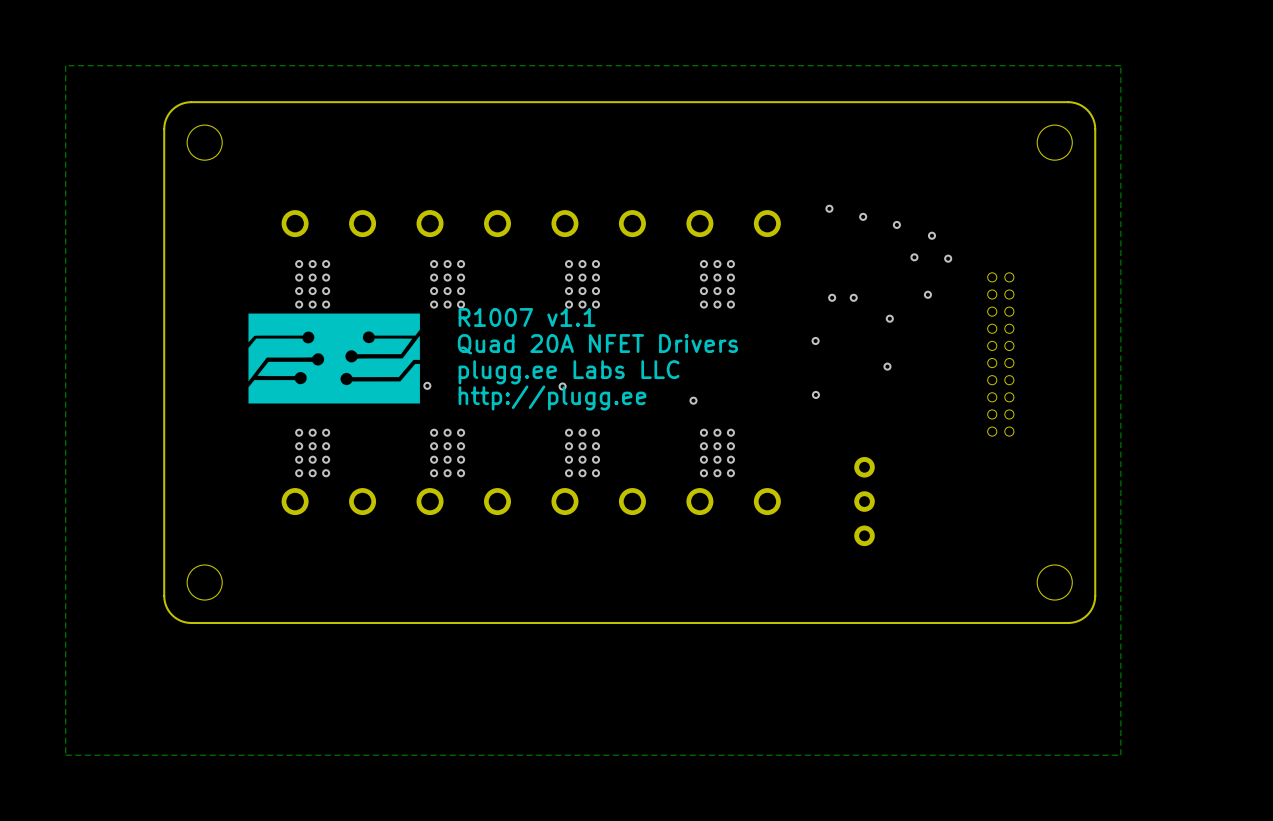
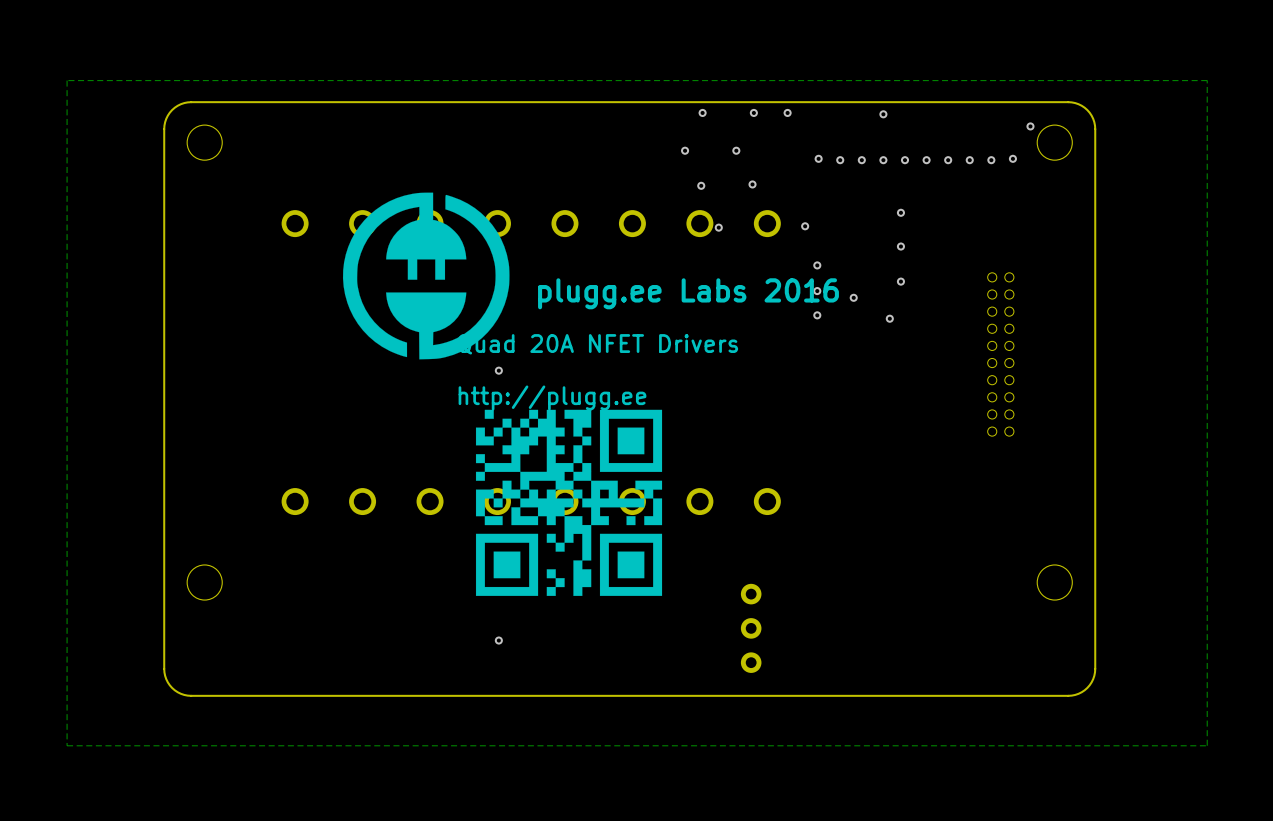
zone outline: (1120, 65) (1120, 755) (65, 755) (65, 65) (1120, 65) -> (1207, 80) (1207, 745) (67, 745) (67, 80) (1207, 80)
via: none -> (702, 112)
via: none -> (753, 112)
via: none -> (787, 112)
via: none -> (883, 114)
via: none -> (1030, 126)
via: none -> (685, 150)
via: none -> (736, 150)
via: none -> (818, 158)
via: none -> (1012, 158)
via: none -> (840, 160)
via: none -> (861, 160)
via: none -> (883, 160)
via: none -> (904, 160)
via: none -> (926, 160)
via: none -> (948, 160)
via: none -> (969, 160)
via: none -> (991, 160)
via: none -> (752, 184)
via: none -> (701, 185)
drawing: none -> [342, 192, 510, 360]
via: (829, 208) -> none
via: none -> (900, 212)
via: (863, 216) -> none
via: (896, 224) -> none
via: none -> (805, 226)
via: none -> (718, 227)
via: (931, 235) -> none
via: none -> (900, 246)
via: (914, 257) -> none
via: (948, 258) -> none
via: (299, 264) -> none
via: (312, 264) -> none
via: (326, 264) -> none
via: (434, 264) -> none
via: (447, 264) -> none
via: (461, 264) -> none
via: (569, 264) -> none
via: (582, 264) -> none
via: (596, 264) -> none
via: (703, 264) -> none
via: (717, 264) -> none
via: (730, 264) -> none
via: none -> (817, 265)
via: (299, 277) -> none
via: (312, 277) -> none
via: (326, 277) -> none
via: (434, 277) -> none
via: (447, 277) -> none
via: (461, 277) -> none
via: (569, 277) -> none
via: (582, 277) -> none
via: (596, 277) -> none
via: (703, 277) -> none
via: (717, 277) -> none
via: (730, 277) -> none
via: none -> (900, 281)
via: (299, 291) -> none
via: (312, 291) -> none
via: (326, 291) -> none
via: (434, 291) -> none
via: (447, 291) -> none
via: (461, 291) -> none
via: (569, 291) -> none
via: (582, 291) -> none
via: (596, 291) -> none
via: (703, 291) -> none
via: (717, 291) -> none
via: (730, 291) -> none
via: none -> (817, 291)
text: none -> plugg.ee Labs 2016 (688, 293)
via: (927, 294) -> none
via: (832, 297) -> none
via: (299, 304) -> none
via: (312, 304) -> none
via: (326, 304) -> none
via: (434, 304) -> none
via: (447, 304) -> none
via: (461, 304) -> none
via: (569, 304) -> none
via: (582, 304) -> none
via: (596, 304) -> none
via: (703, 304) -> none
via: (717, 304) -> none
via: (730, 304) -> none
drawing: [248, 313, 420, 404] -> none
via: none -> (817, 315)
text: R1007 v1.1 (527, 317) -> none
via: (815, 340) -> none
via: (887, 366) -> none
via: none -> (498, 370)
text: plugg.ee Labs LLC (569, 372) -> none
via: (427, 385) -> none
via: (562, 386) -> none
via: (815, 394) -> none
via: (693, 400) -> none
drawing: none -> [475, 409, 663, 596]
via: (299, 432) -> none
via: (312, 432) -> none
via: (326, 432) -> none
via: (434, 432) -> none
via: (447, 432) -> none
via: (461, 432) -> none
via: (569, 432) -> none
via: (582, 432) -> none
via: (596, 432) -> none
via: (703, 432) -> none
via: (717, 432) -> none
via: (730, 432) -> none
via: (299, 446) -> none
via: (312, 446) -> none
via: (326, 446) -> none
via: (434, 446) -> none
via: (447, 446) -> none
via: (461, 446) -> none
via: (569, 446) -> none
via: (582, 446) -> none
via: (596, 446) -> none
via: (703, 446) -> none
via: (717, 446) -> none
via: (730, 446) -> none
via: (299, 459) -> none
via: (312, 459) -> none
via: (326, 459) -> none
via: (434, 459) -> none
via: (447, 459) -> none
via: (461, 459) -> none
via: (569, 459) -> none
via: (582, 459) -> none
via: (596, 459) -> none
via: (703, 459) -> none
via: (717, 459) -> none
via: (730, 459) -> none
via: (299, 473) -> none
via: (312, 473) -> none
via: (326, 473) -> none
via: (434, 473) -> none
via: (447, 473) -> none
via: (461, 473) -> none
via: (569, 473) -> none
via: (582, 473) -> none
via: (596, 473) -> none
via: (703, 473) -> none
via: (717, 473) -> none
via: (730, 473) -> none
part position: (864, 501) -> (751, 628)
board edge: (1095, 596) (1093, 606) (1087, 615) (1078, 620) (1068, 622) (191, 622) (180, 620) (172, 615) (166, 606) (164, 596) -> (1095, 596) (1094, 675) (1084, 690) (1068, 695) (187, 695) (172, 687) (165, 675) (164, 596)
via: none -> (498, 640)

